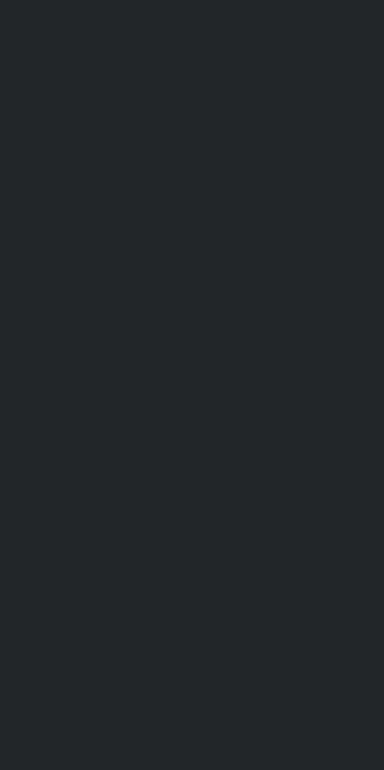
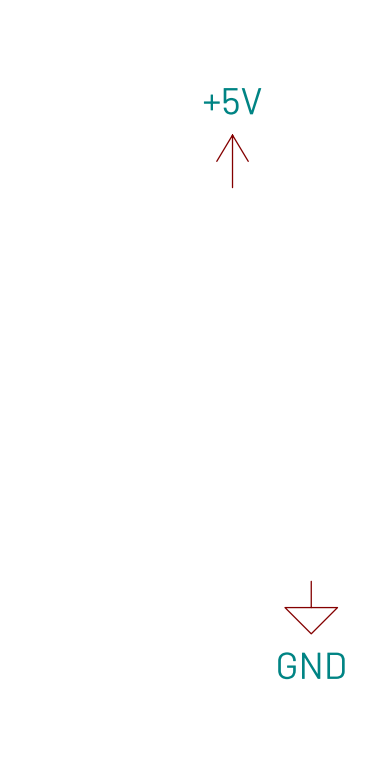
power symbol: none -> +5V (232, 161)
power symbol: none -> GND (311, 607)

